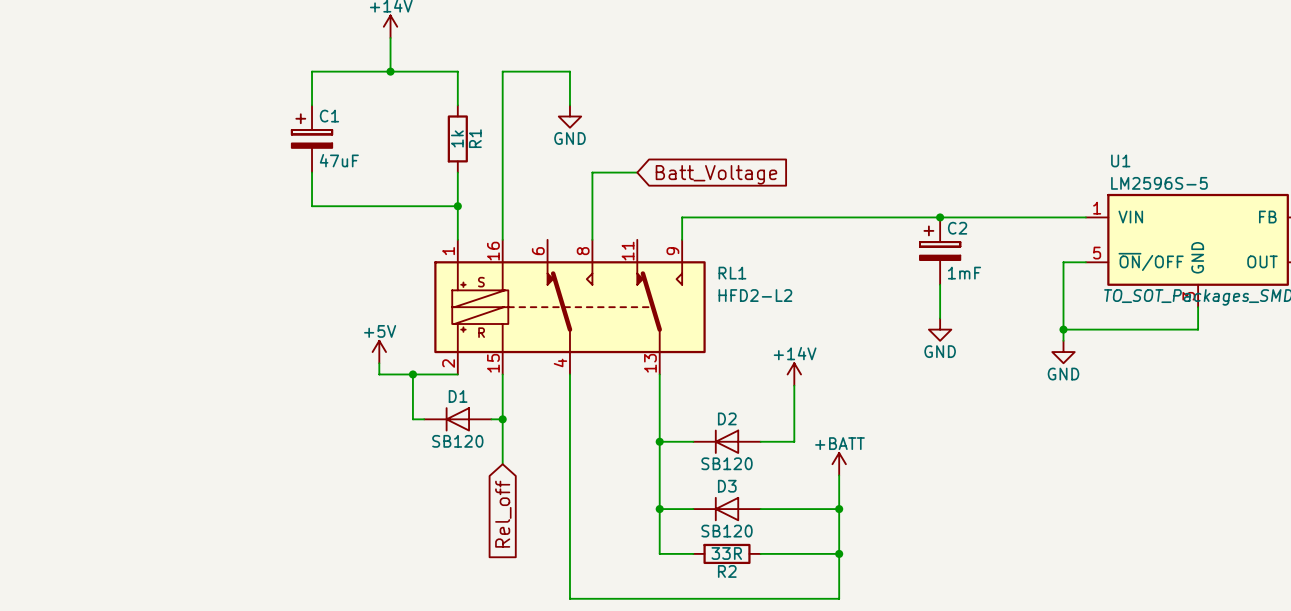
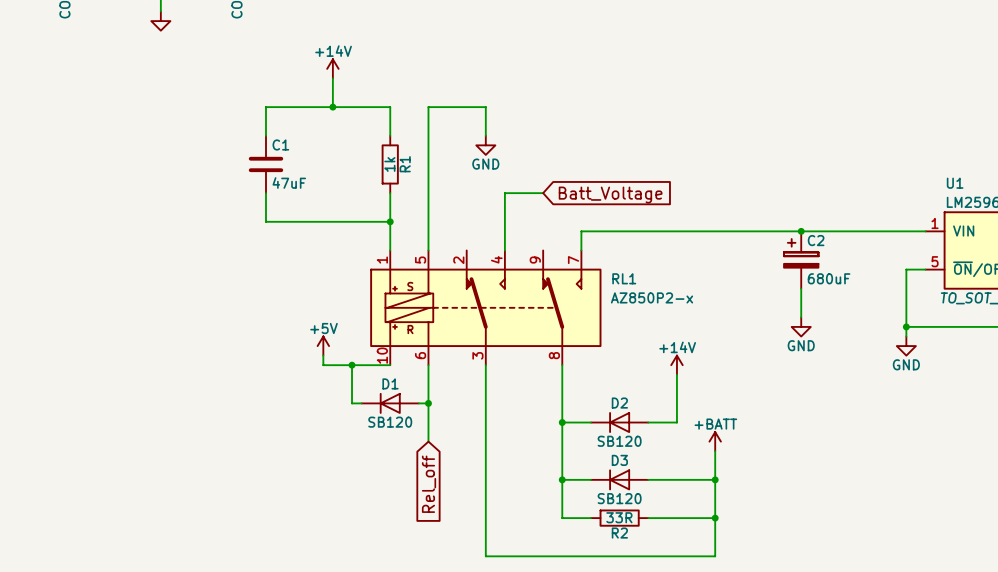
C1 symbol: [291, 105, 333, 173] -> [248, 135, 284, 194]
RL1 symbol: [434, 239, 706, 375] -> [370, 250, 602, 366]
C2 value: 1mF (964, 273) -> 680uF (829, 278)
RL1 value: HFD2-L2 (755, 295) -> AZ850P2-x (652, 297)

